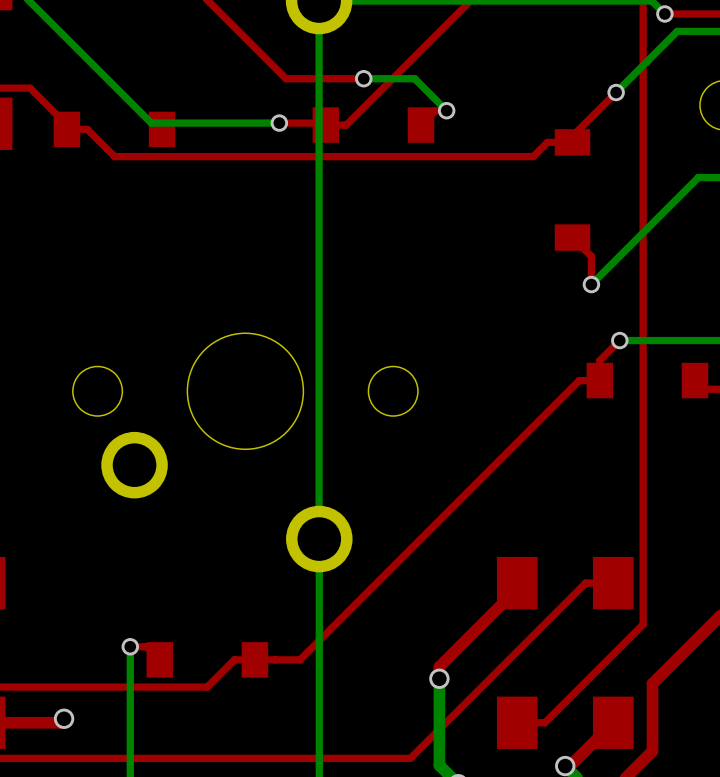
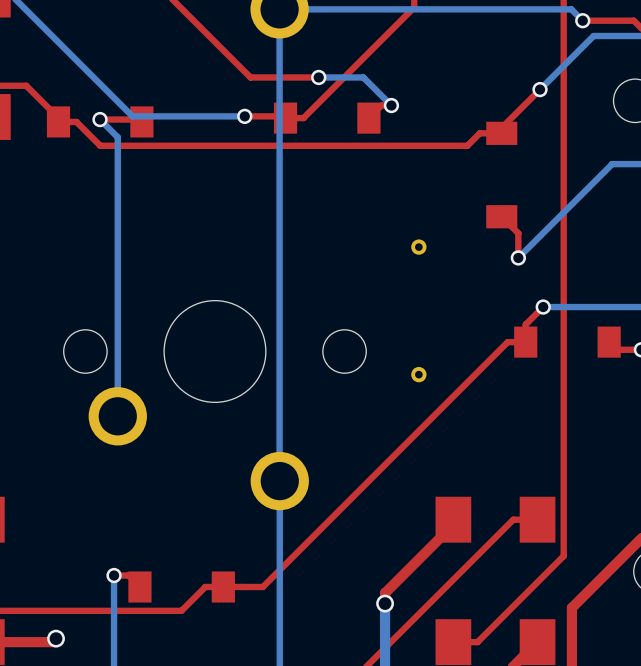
top track: none -> (100, 119) (139, 119) (141, 121)
bottom track: none -> (100, 119) (117, 137) (117, 416)
via: none -> (100, 119)
part: none -> (418, 247)
part: none -> (418, 374)

